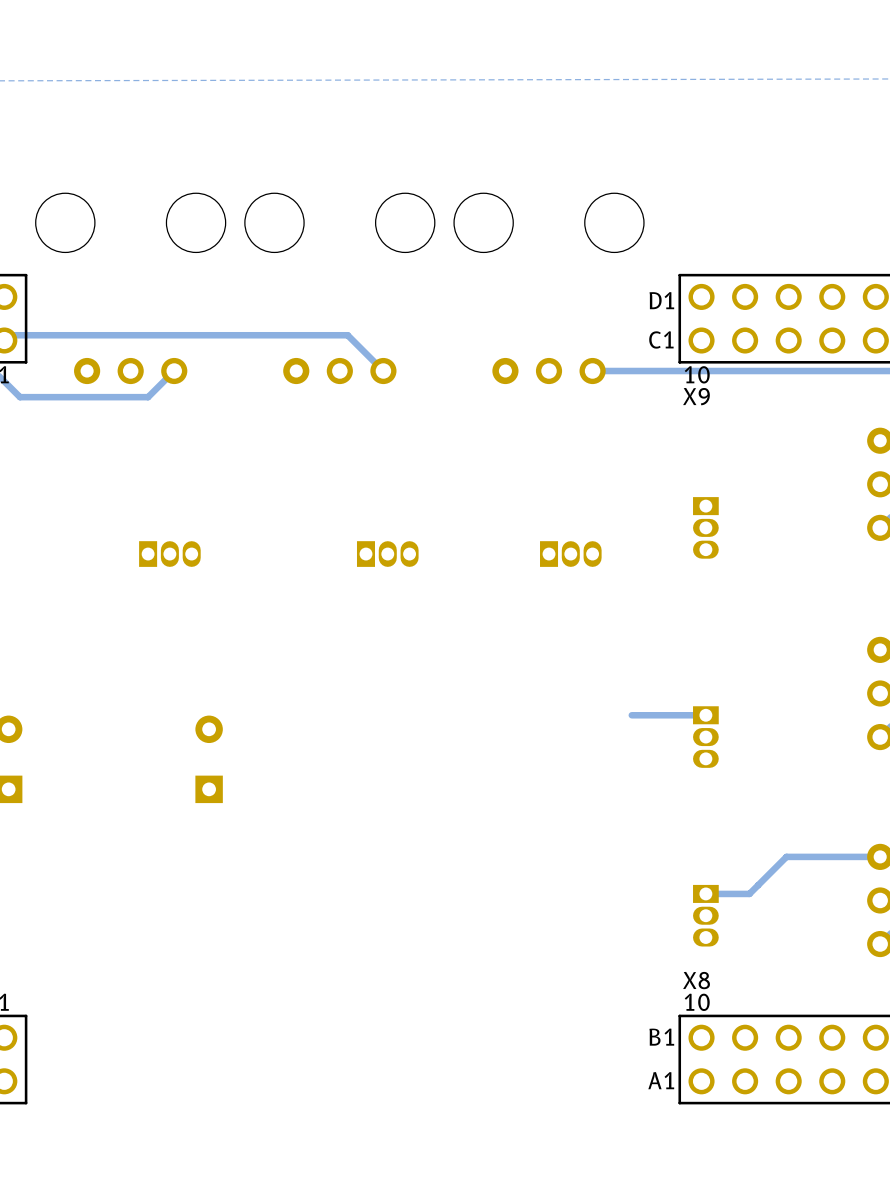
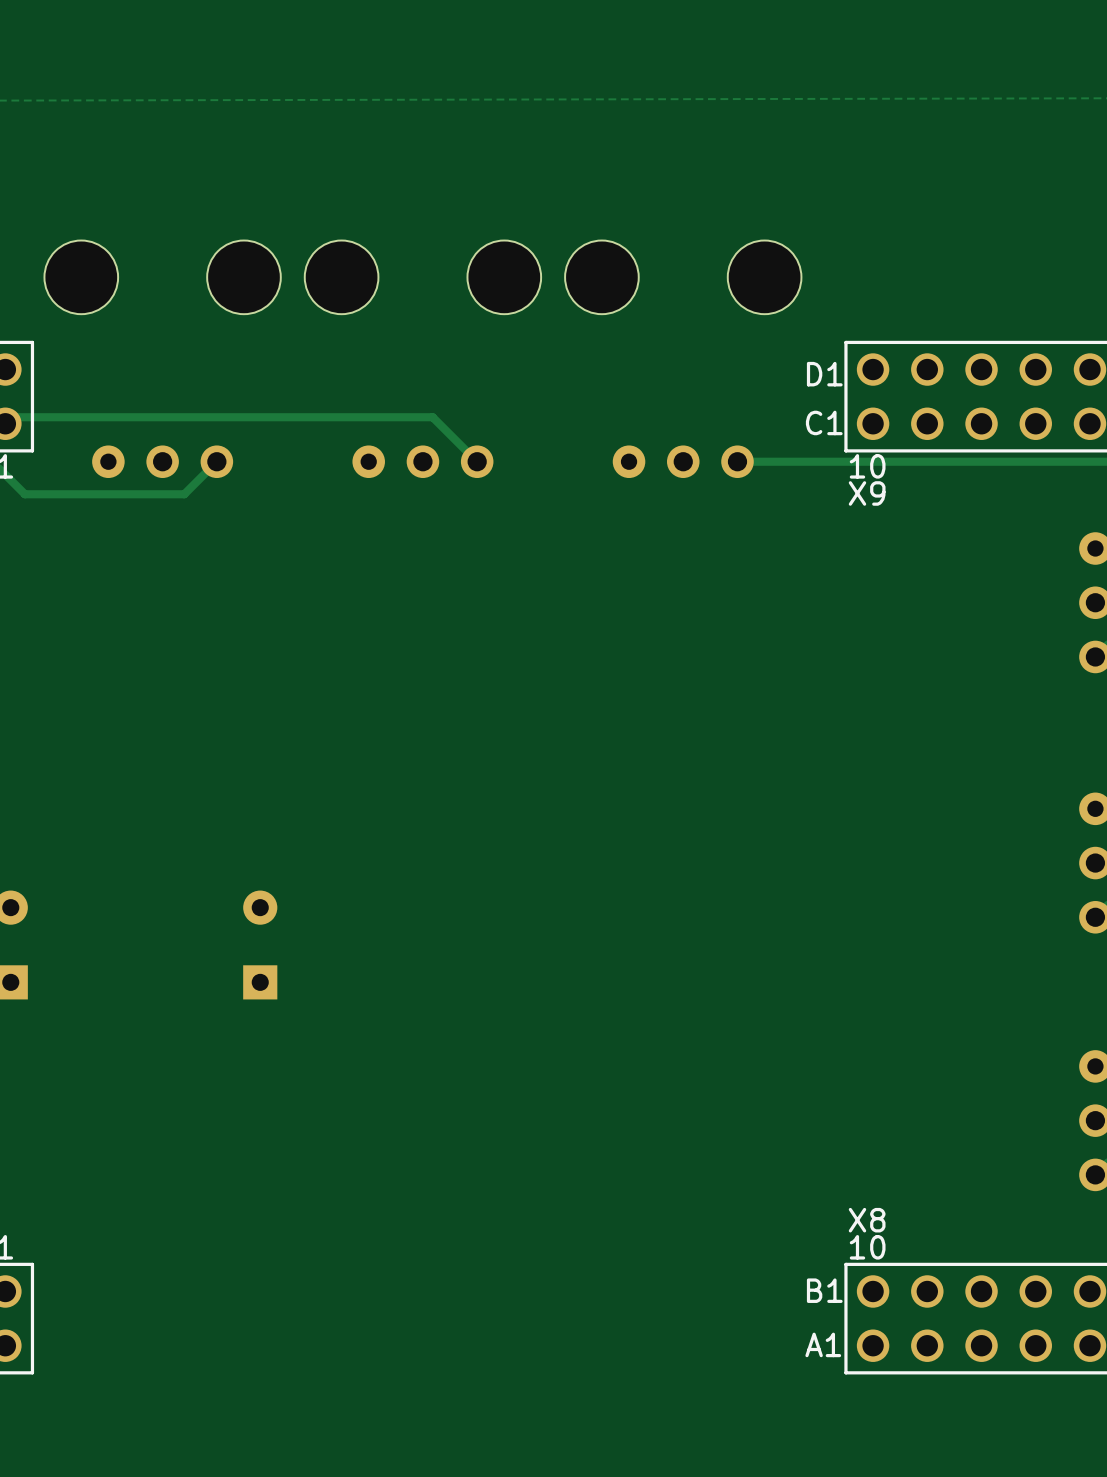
part: (705, 527) -> none
part: (169, 554) -> none
part: (387, 554) -> none
part: (570, 554) -> none
track: (705, 715) (631, 715) -> none
part: (705, 737) -> none
track: (880, 856) (786, 856) (749, 893) (705, 893) -> none
part: (705, 915) -> none

